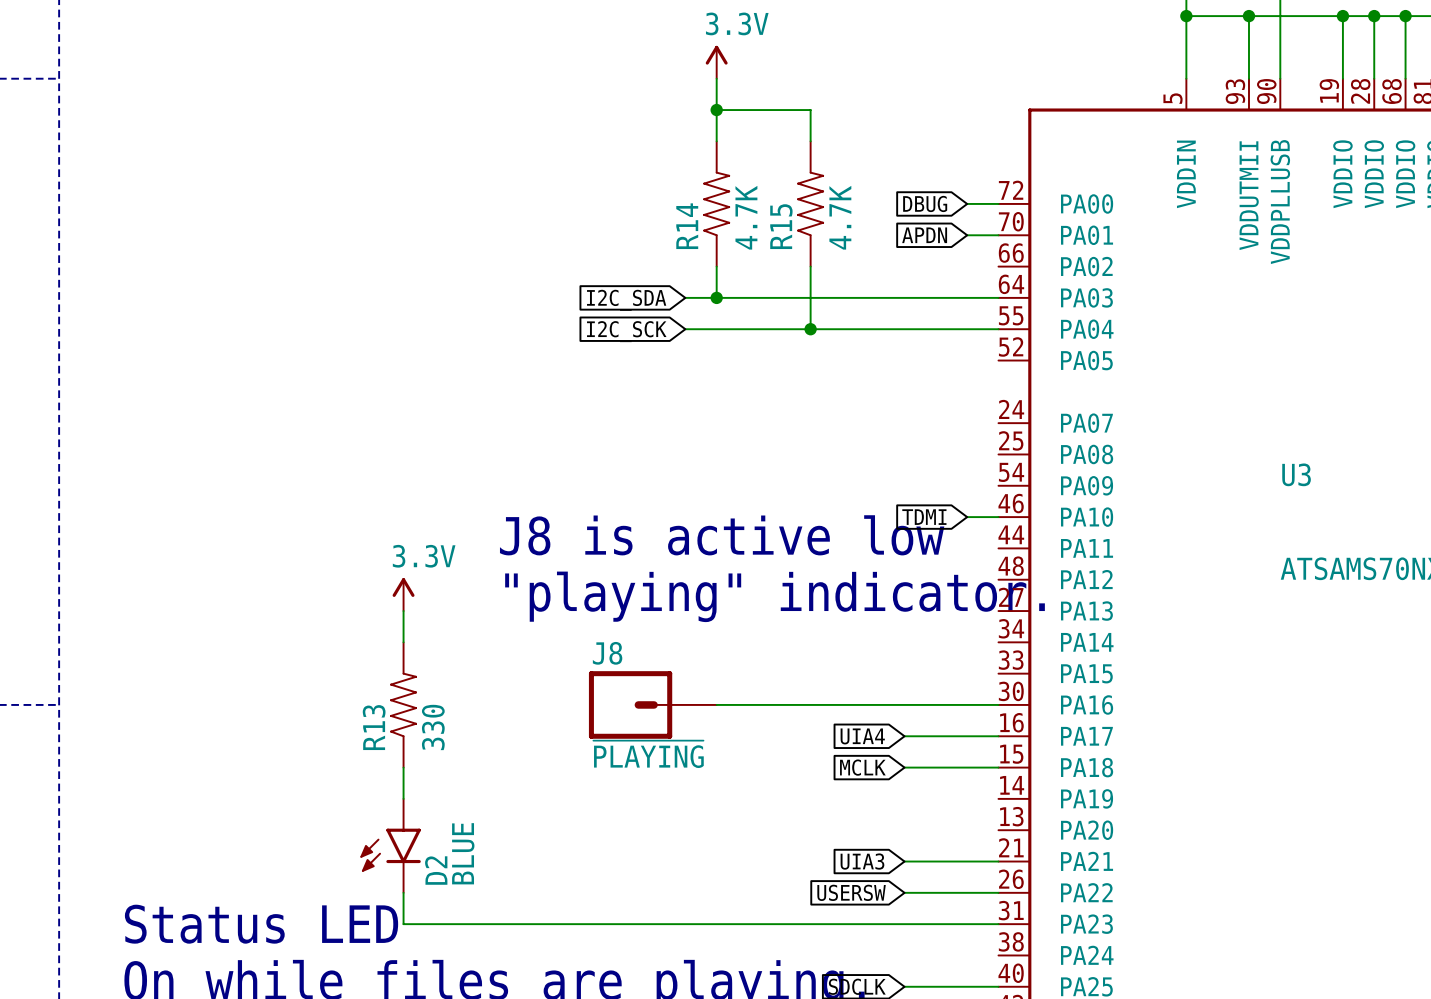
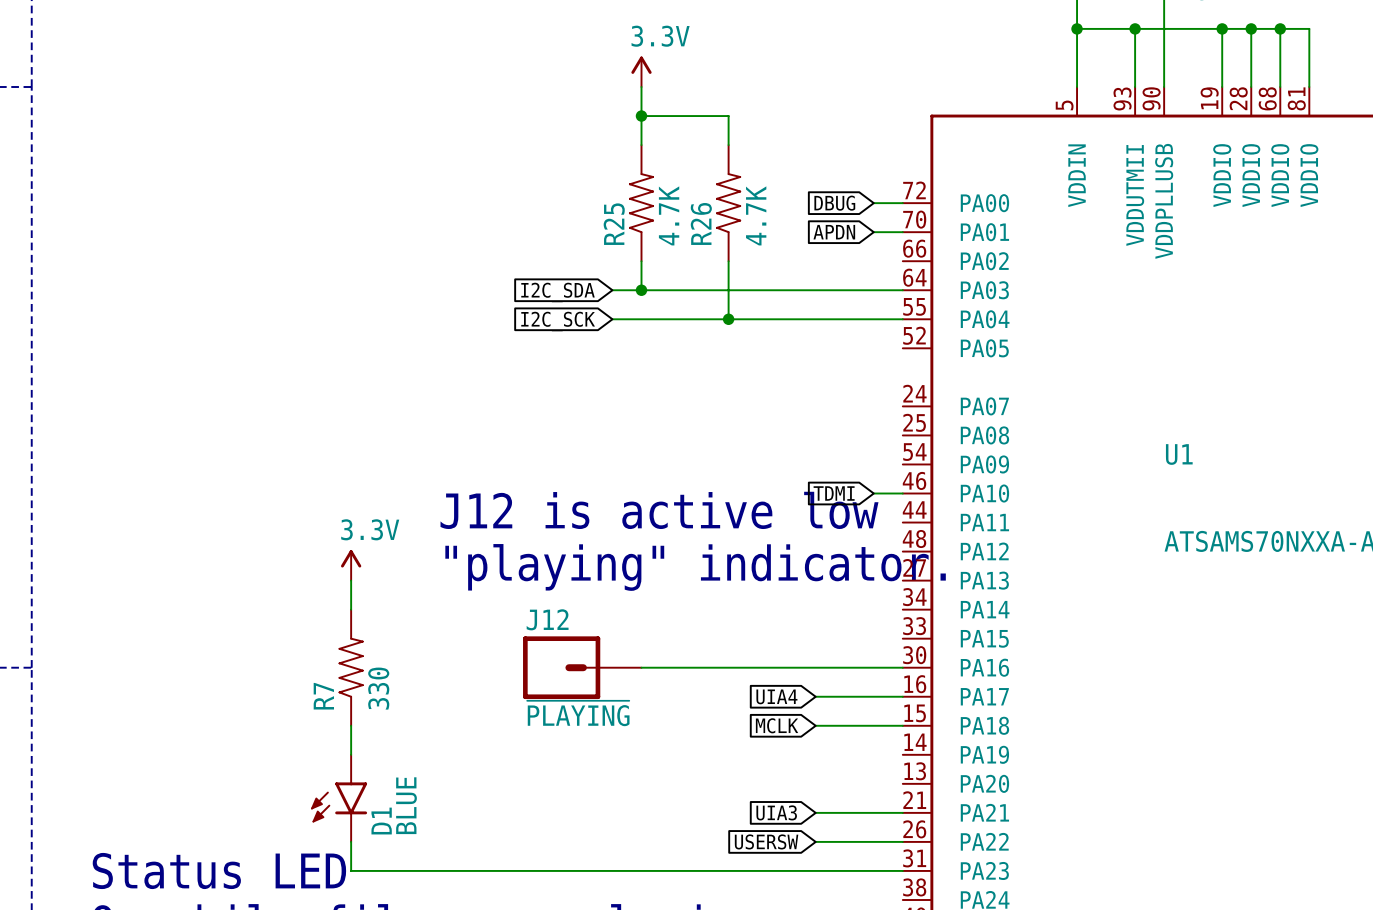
R14 name: R14 (687, 226) -> R25 (614, 224)
R15 name: R15 (781, 226) -> R26 (701, 223)
U3 name: U3 (1296, 474) -> U1 (1179, 454)
text: J8 is active low (722, 535) -> J12 is active low (659, 510)
J8 name: J8 (607, 653) -> J12 (547, 619)
R13 name: R13 (374, 727) -> R7 (323, 696)
D2 name: D2 (436, 870) -> D1 (381, 821)

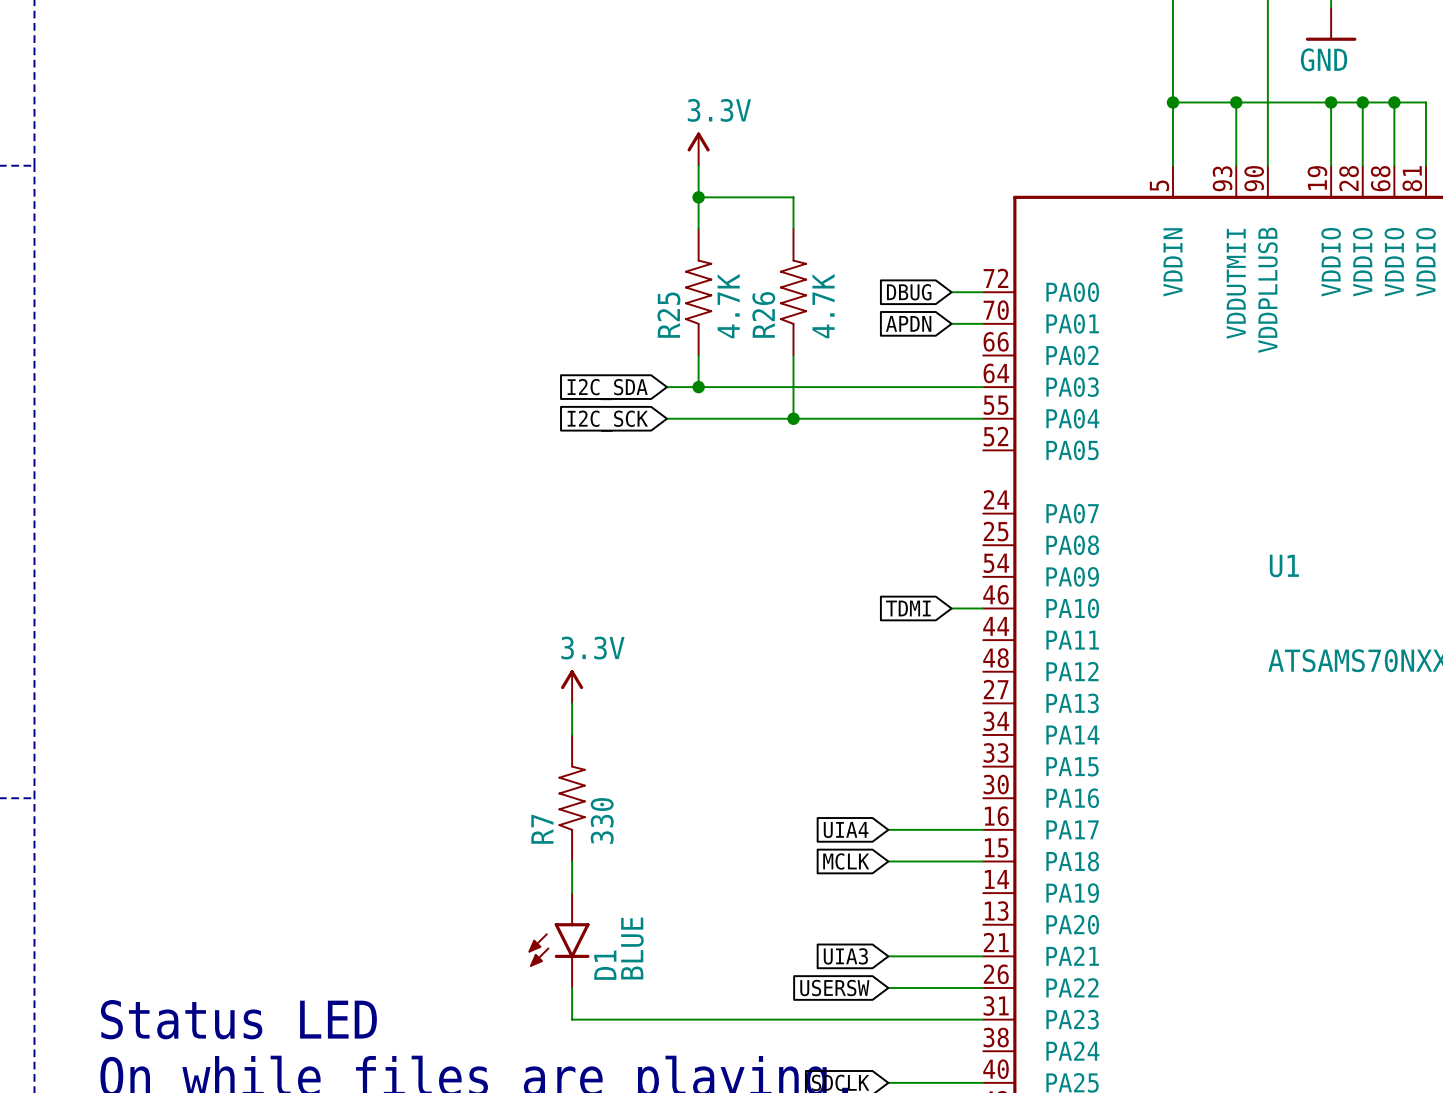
text: J12 is active low (659, 510) -> none
power symbol position: 3.3V (351, 565) -> 3.3V (572, 686)
text: "playing" indicator. (695, 567) -> none
wire: (351, 580) (351, 609) -> (572, 703) (572, 734)
R7 position: (351, 667) -> (572, 798)
J12: ~{PLAYING} (582, 667) -> none
wire: (641, 667) (902, 667) -> none
wire: (351, 725) (351, 754) -> (572, 861) (572, 893)
D1 position: (339, 798) -> (558, 940)
wire: (351, 841) (351, 870) (525, 870) -> (572, 987) (572, 1019)

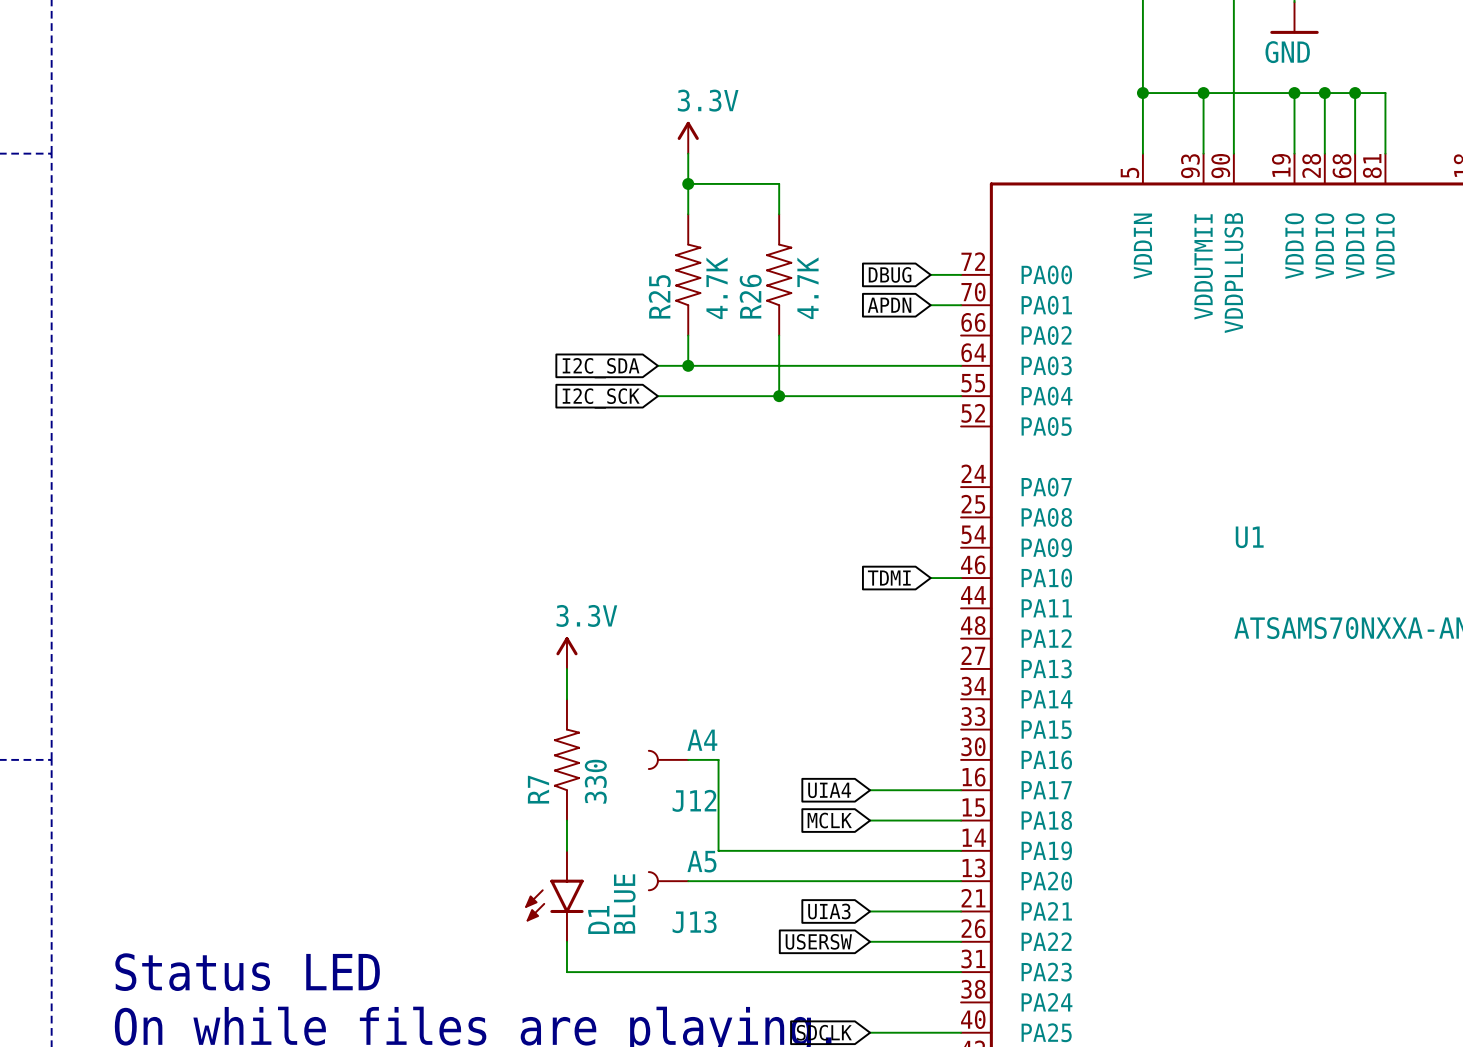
J12: none -> A4 (668, 759)
wire: none -> (688, 759) (718, 759) (718, 850) (961, 850)
J13: none -> A5 (668, 881)
wire: none -> (688, 881) (961, 881)

